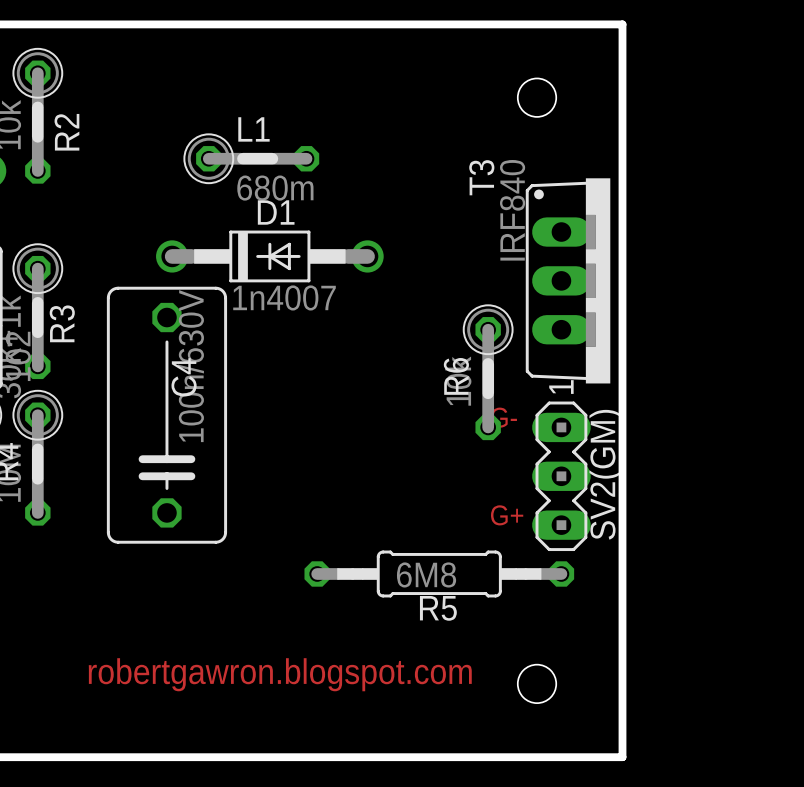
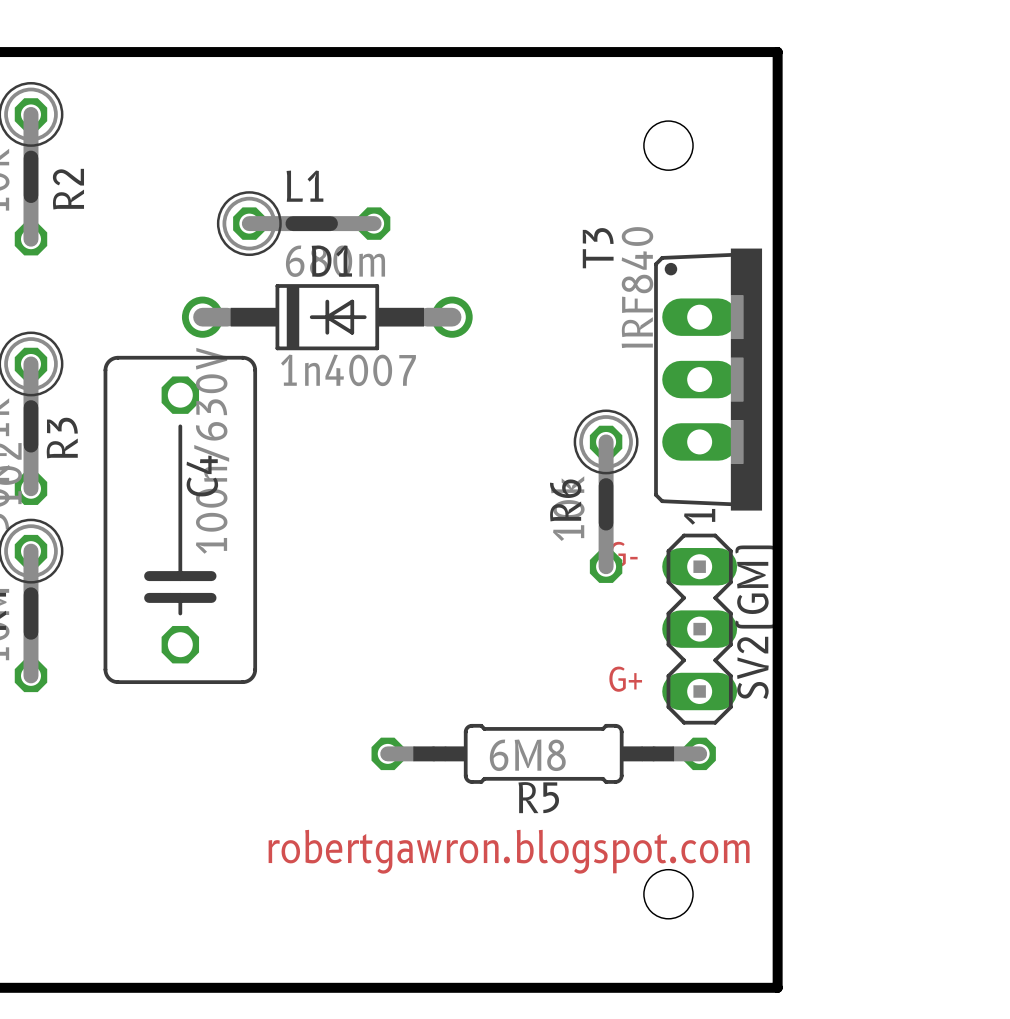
D1 position: (269, 256) -> (327, 317)
C4 position: (166, 415) -> (180, 519)
text position: robertgawron.blogspot.com (280, 674) -> robertgawron.blogspot.com (509, 851)

